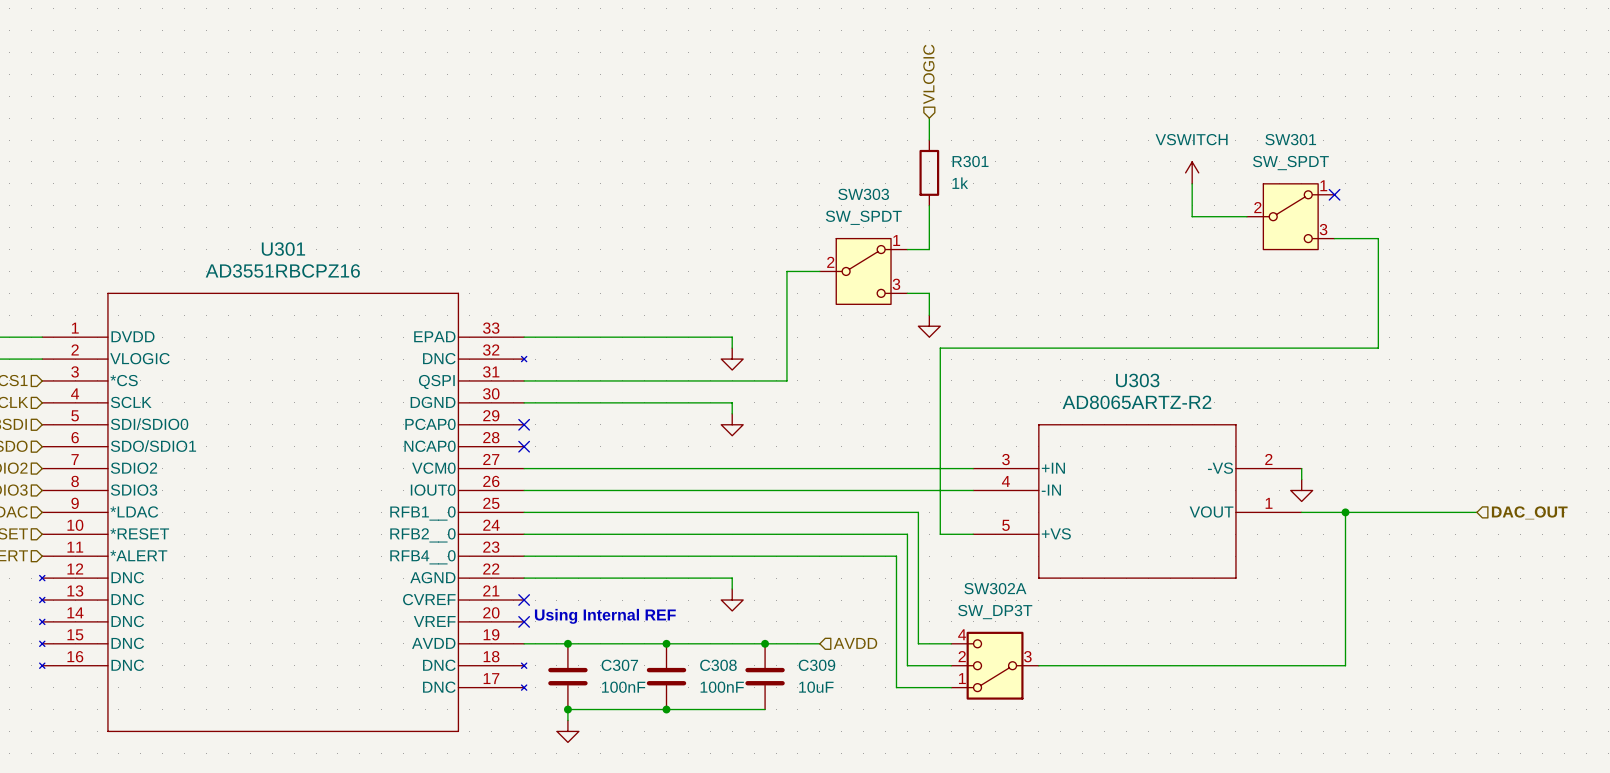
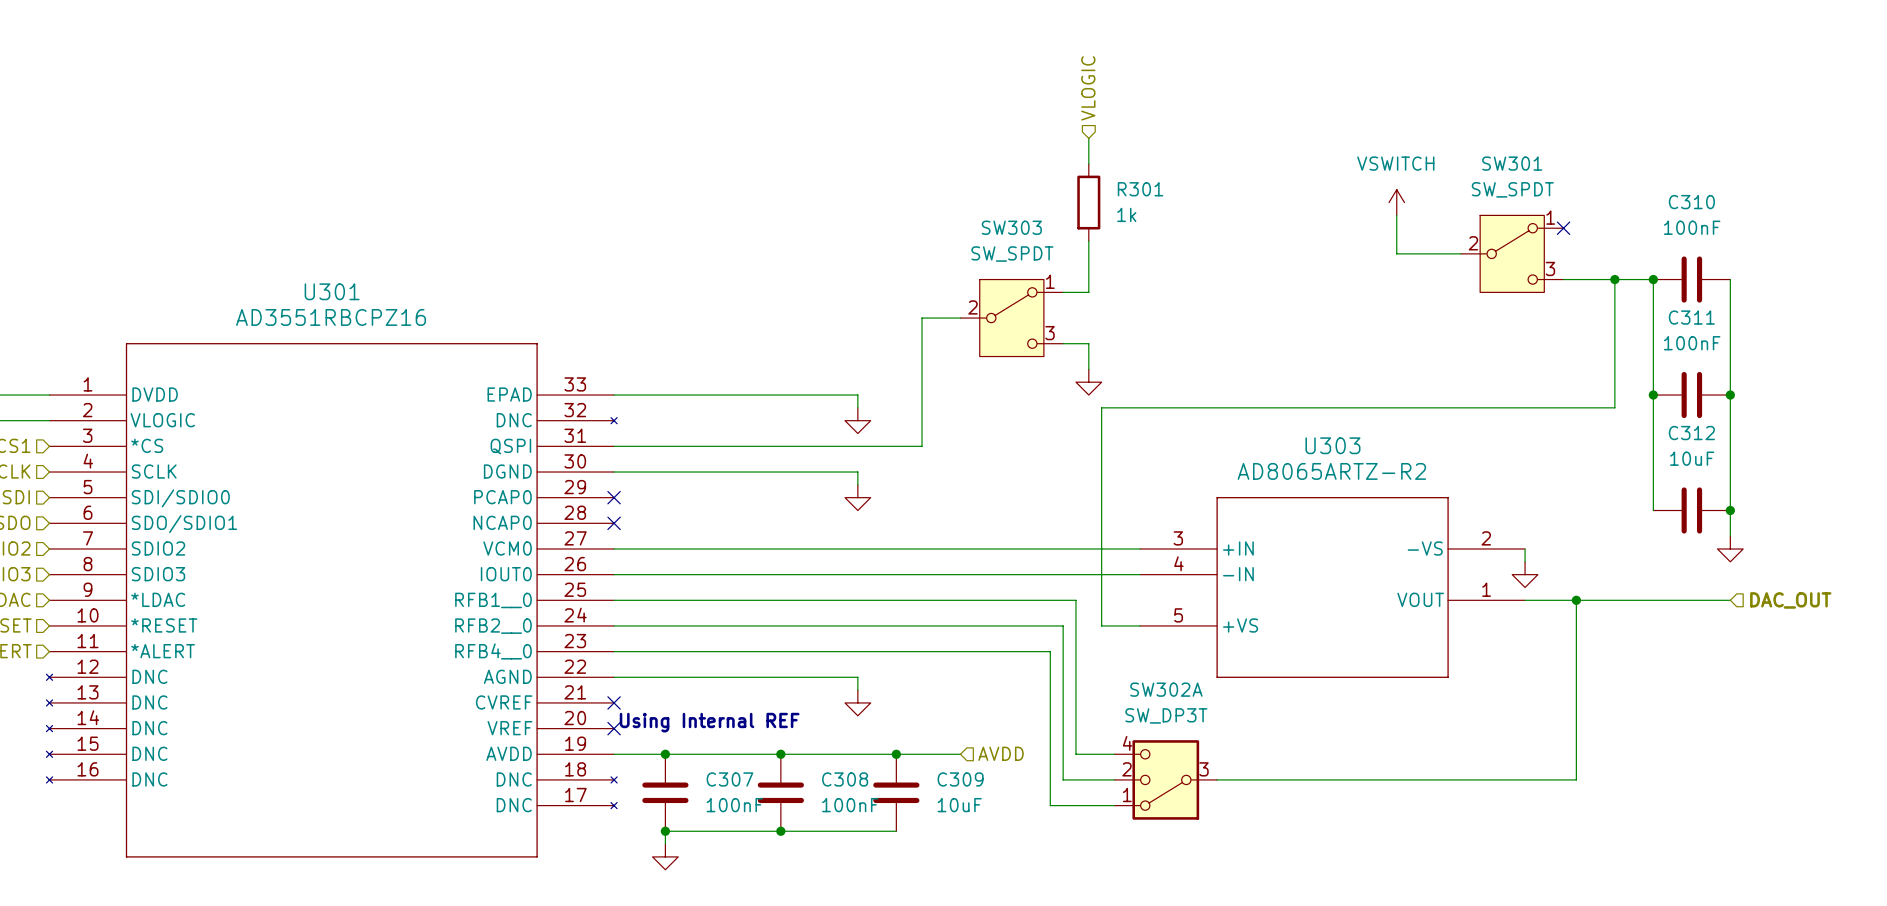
wire: none -> (1614, 279) (1653, 279) (1653, 510)
junction: none -> (1614, 279)
junction: none -> (1653, 279)
C310: none -> 100nF (1691, 279)
wire: none -> (1730, 279) (1730, 536)
junction: none -> (1653, 395)
C311: none -> 100nF (1691, 395)
junction: none -> (1730, 395)
C312: none -> 10uF (1691, 510)
junction: none -> (1730, 510)
power symbol: none -> (1730, 548)

